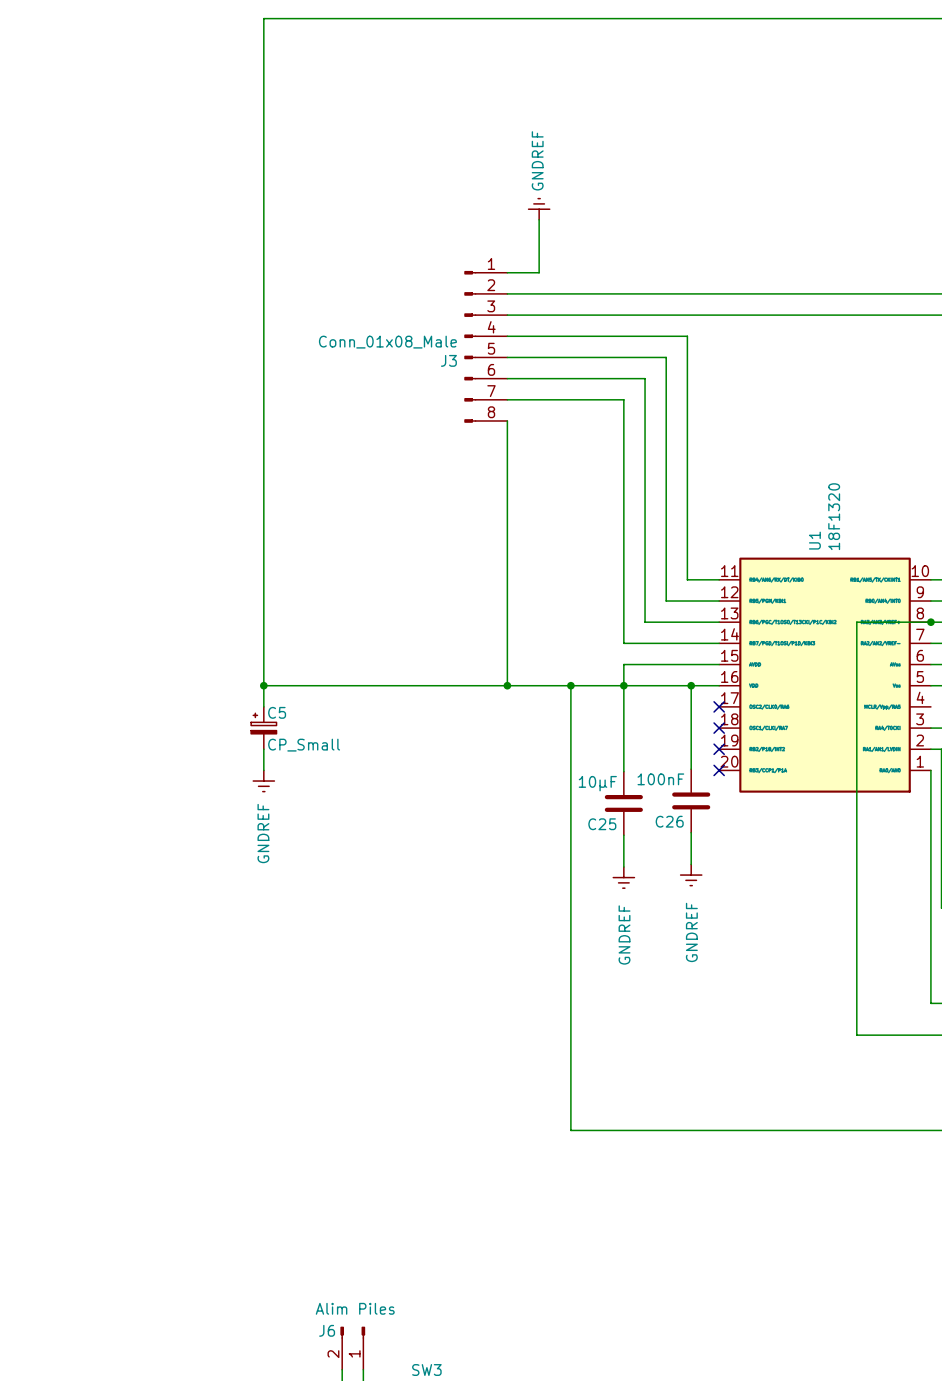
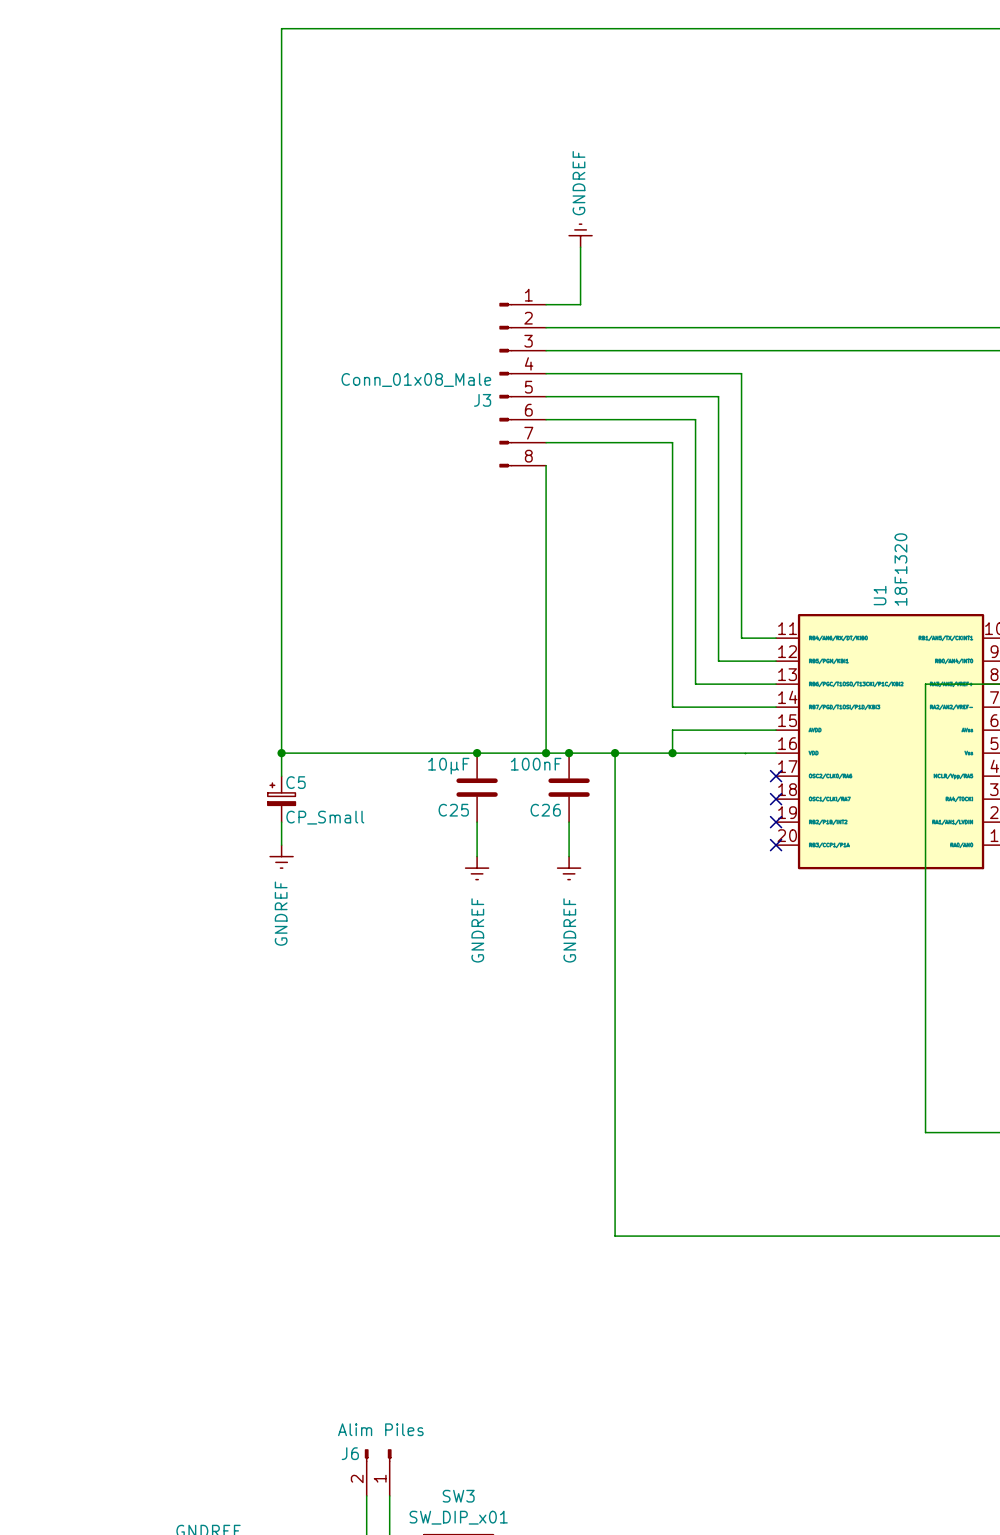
junction: none -> (477, 753)
junction: none -> (569, 753)
wire: (623, 685) (623, 771) -> none
wire: (691, 685) (691, 769) -> none
junction: (691, 685) -> none
wire: none -> (477, 822) (477, 856)
power symbol: none -> GNDREF (477, 868)
power symbol: none -> GNDREF (569, 868)
C26 position: (691, 800) -> (569, 787)
C25 position: (623, 803) -> (477, 787)
wire: (691, 832) (691, 864) -> none
wire: (623, 835) (623, 867) -> (569, 822) (569, 856)
power symbol: GNDREF (691, 875) -> none
power symbol: GNDREF (623, 877) -> none

